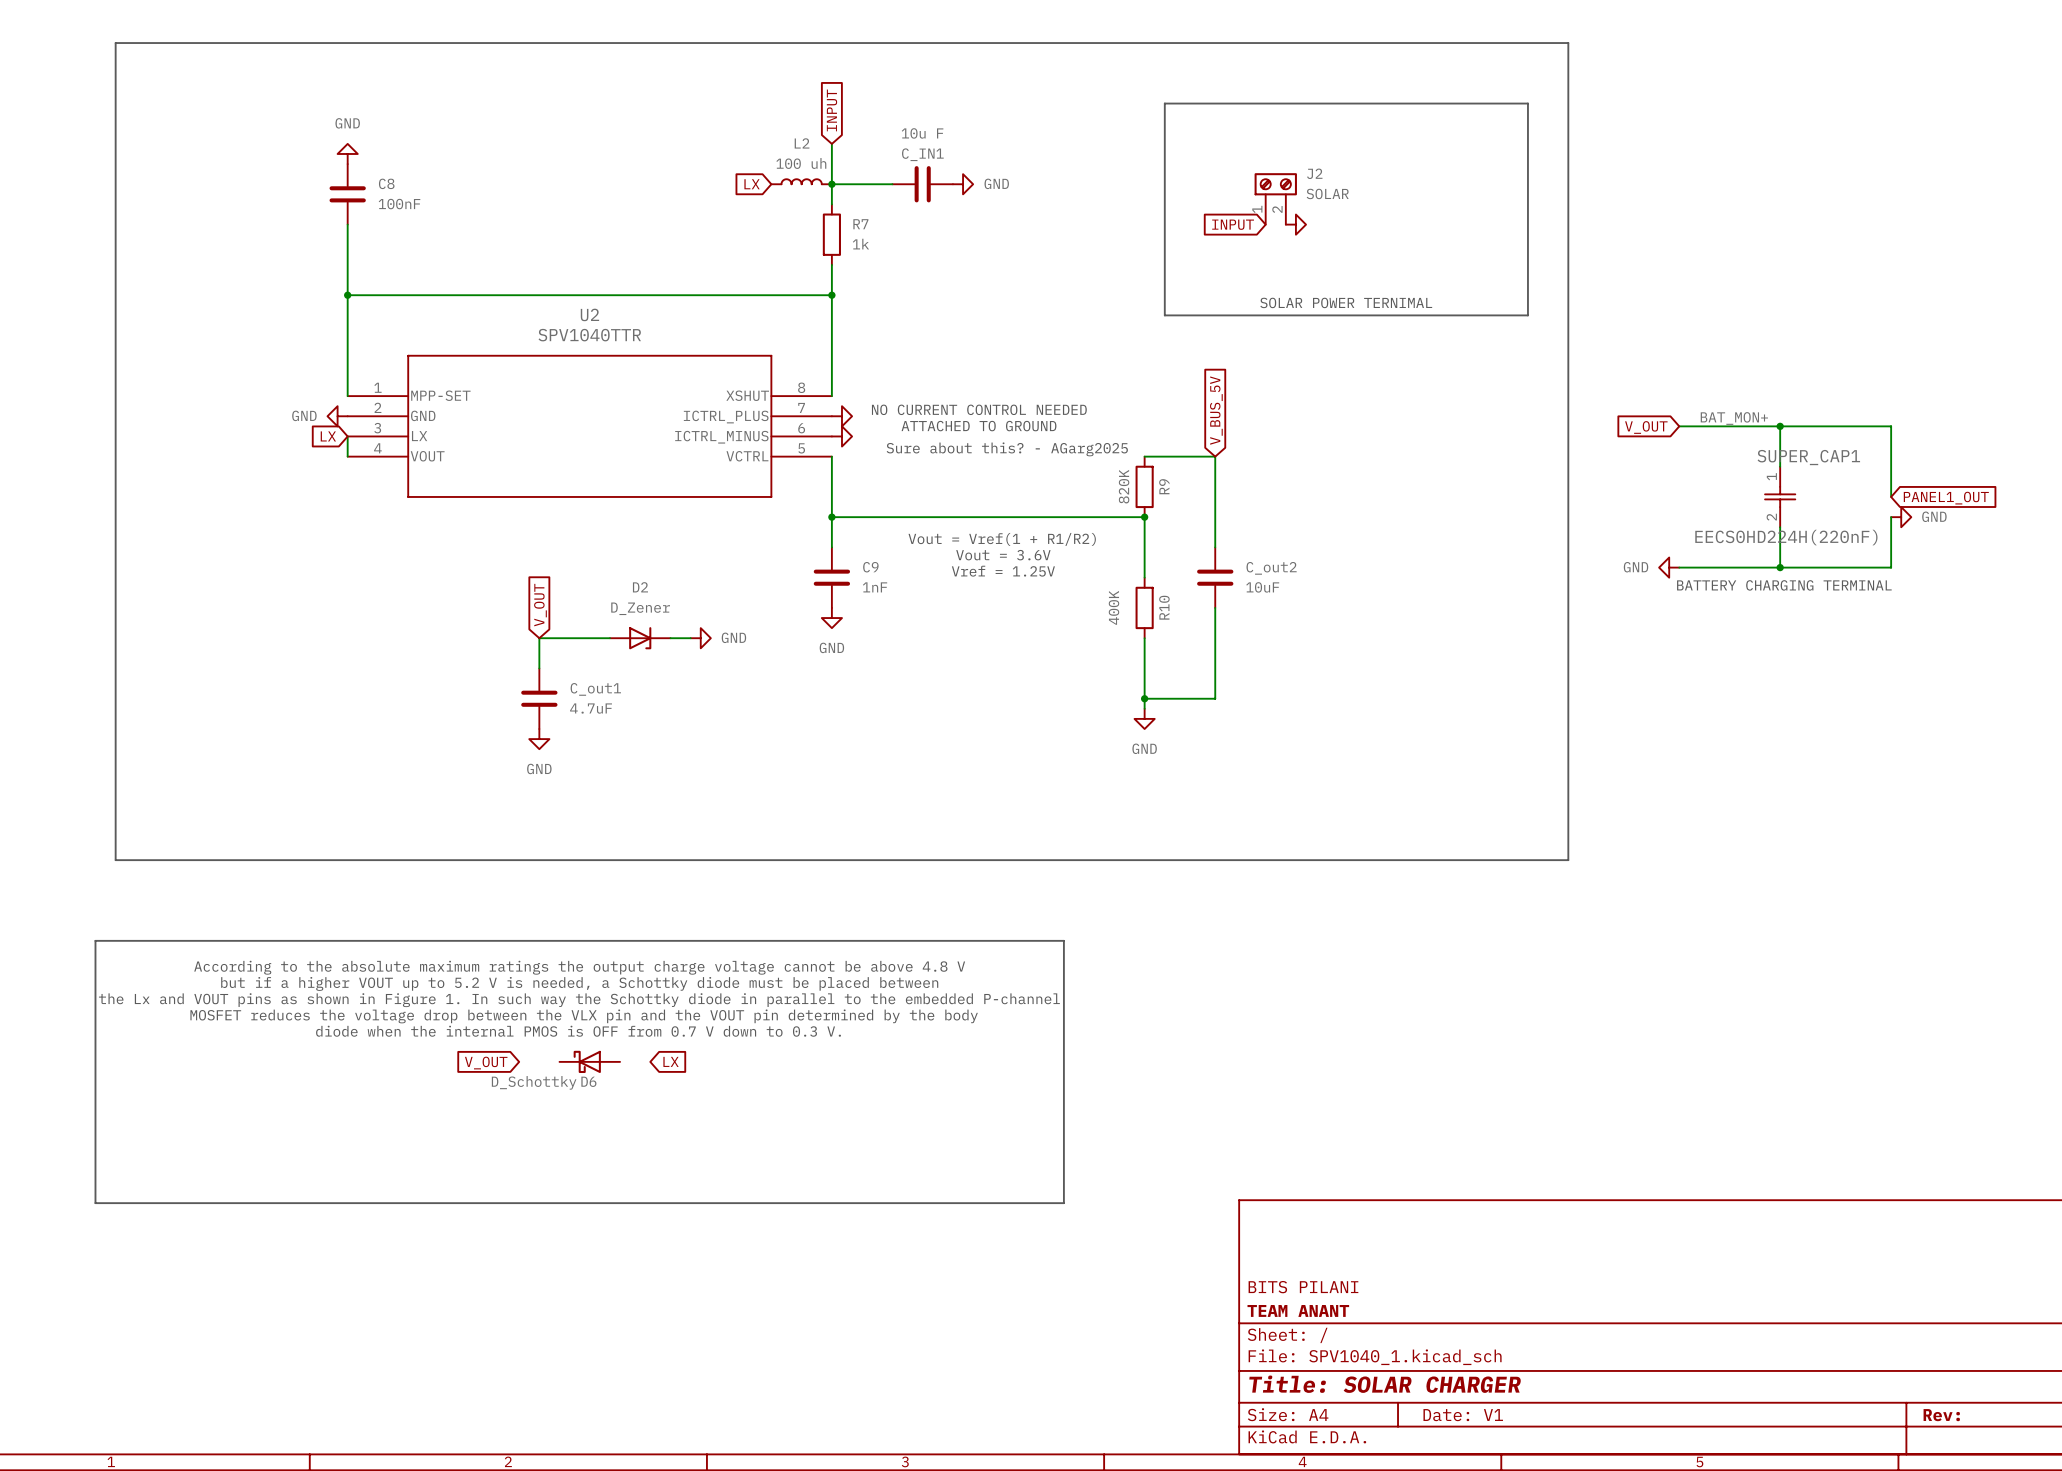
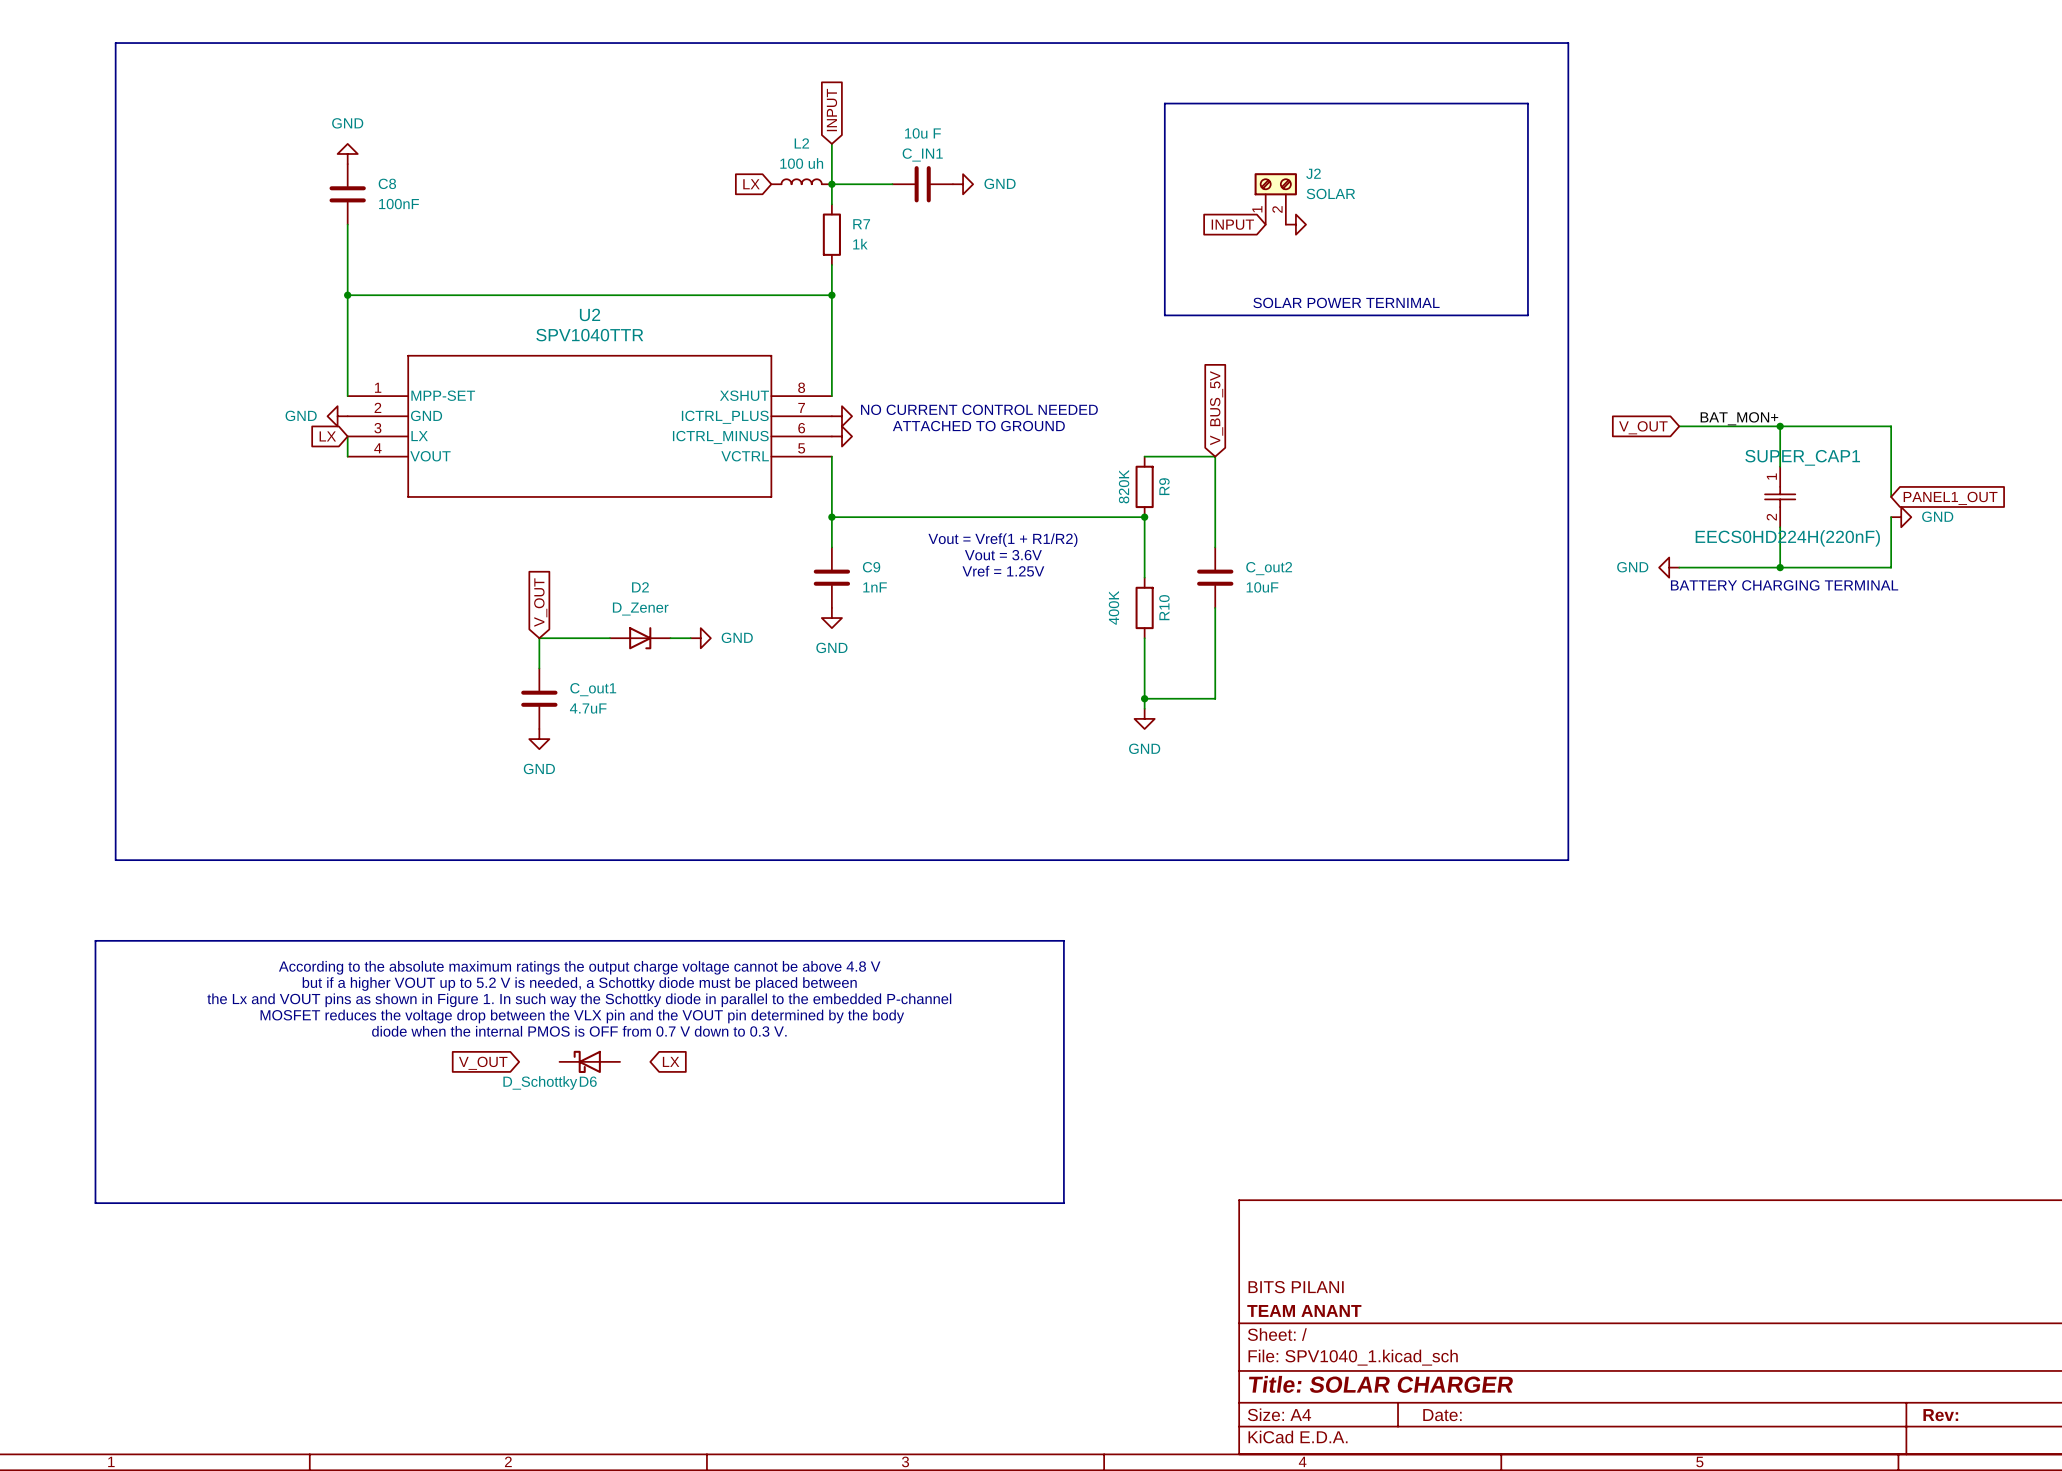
text: Sure about this? - AGarg2025 (1007, 449) -> none
title block: Date: V1 (1463, 1415) -> Date: (1442, 1415)

